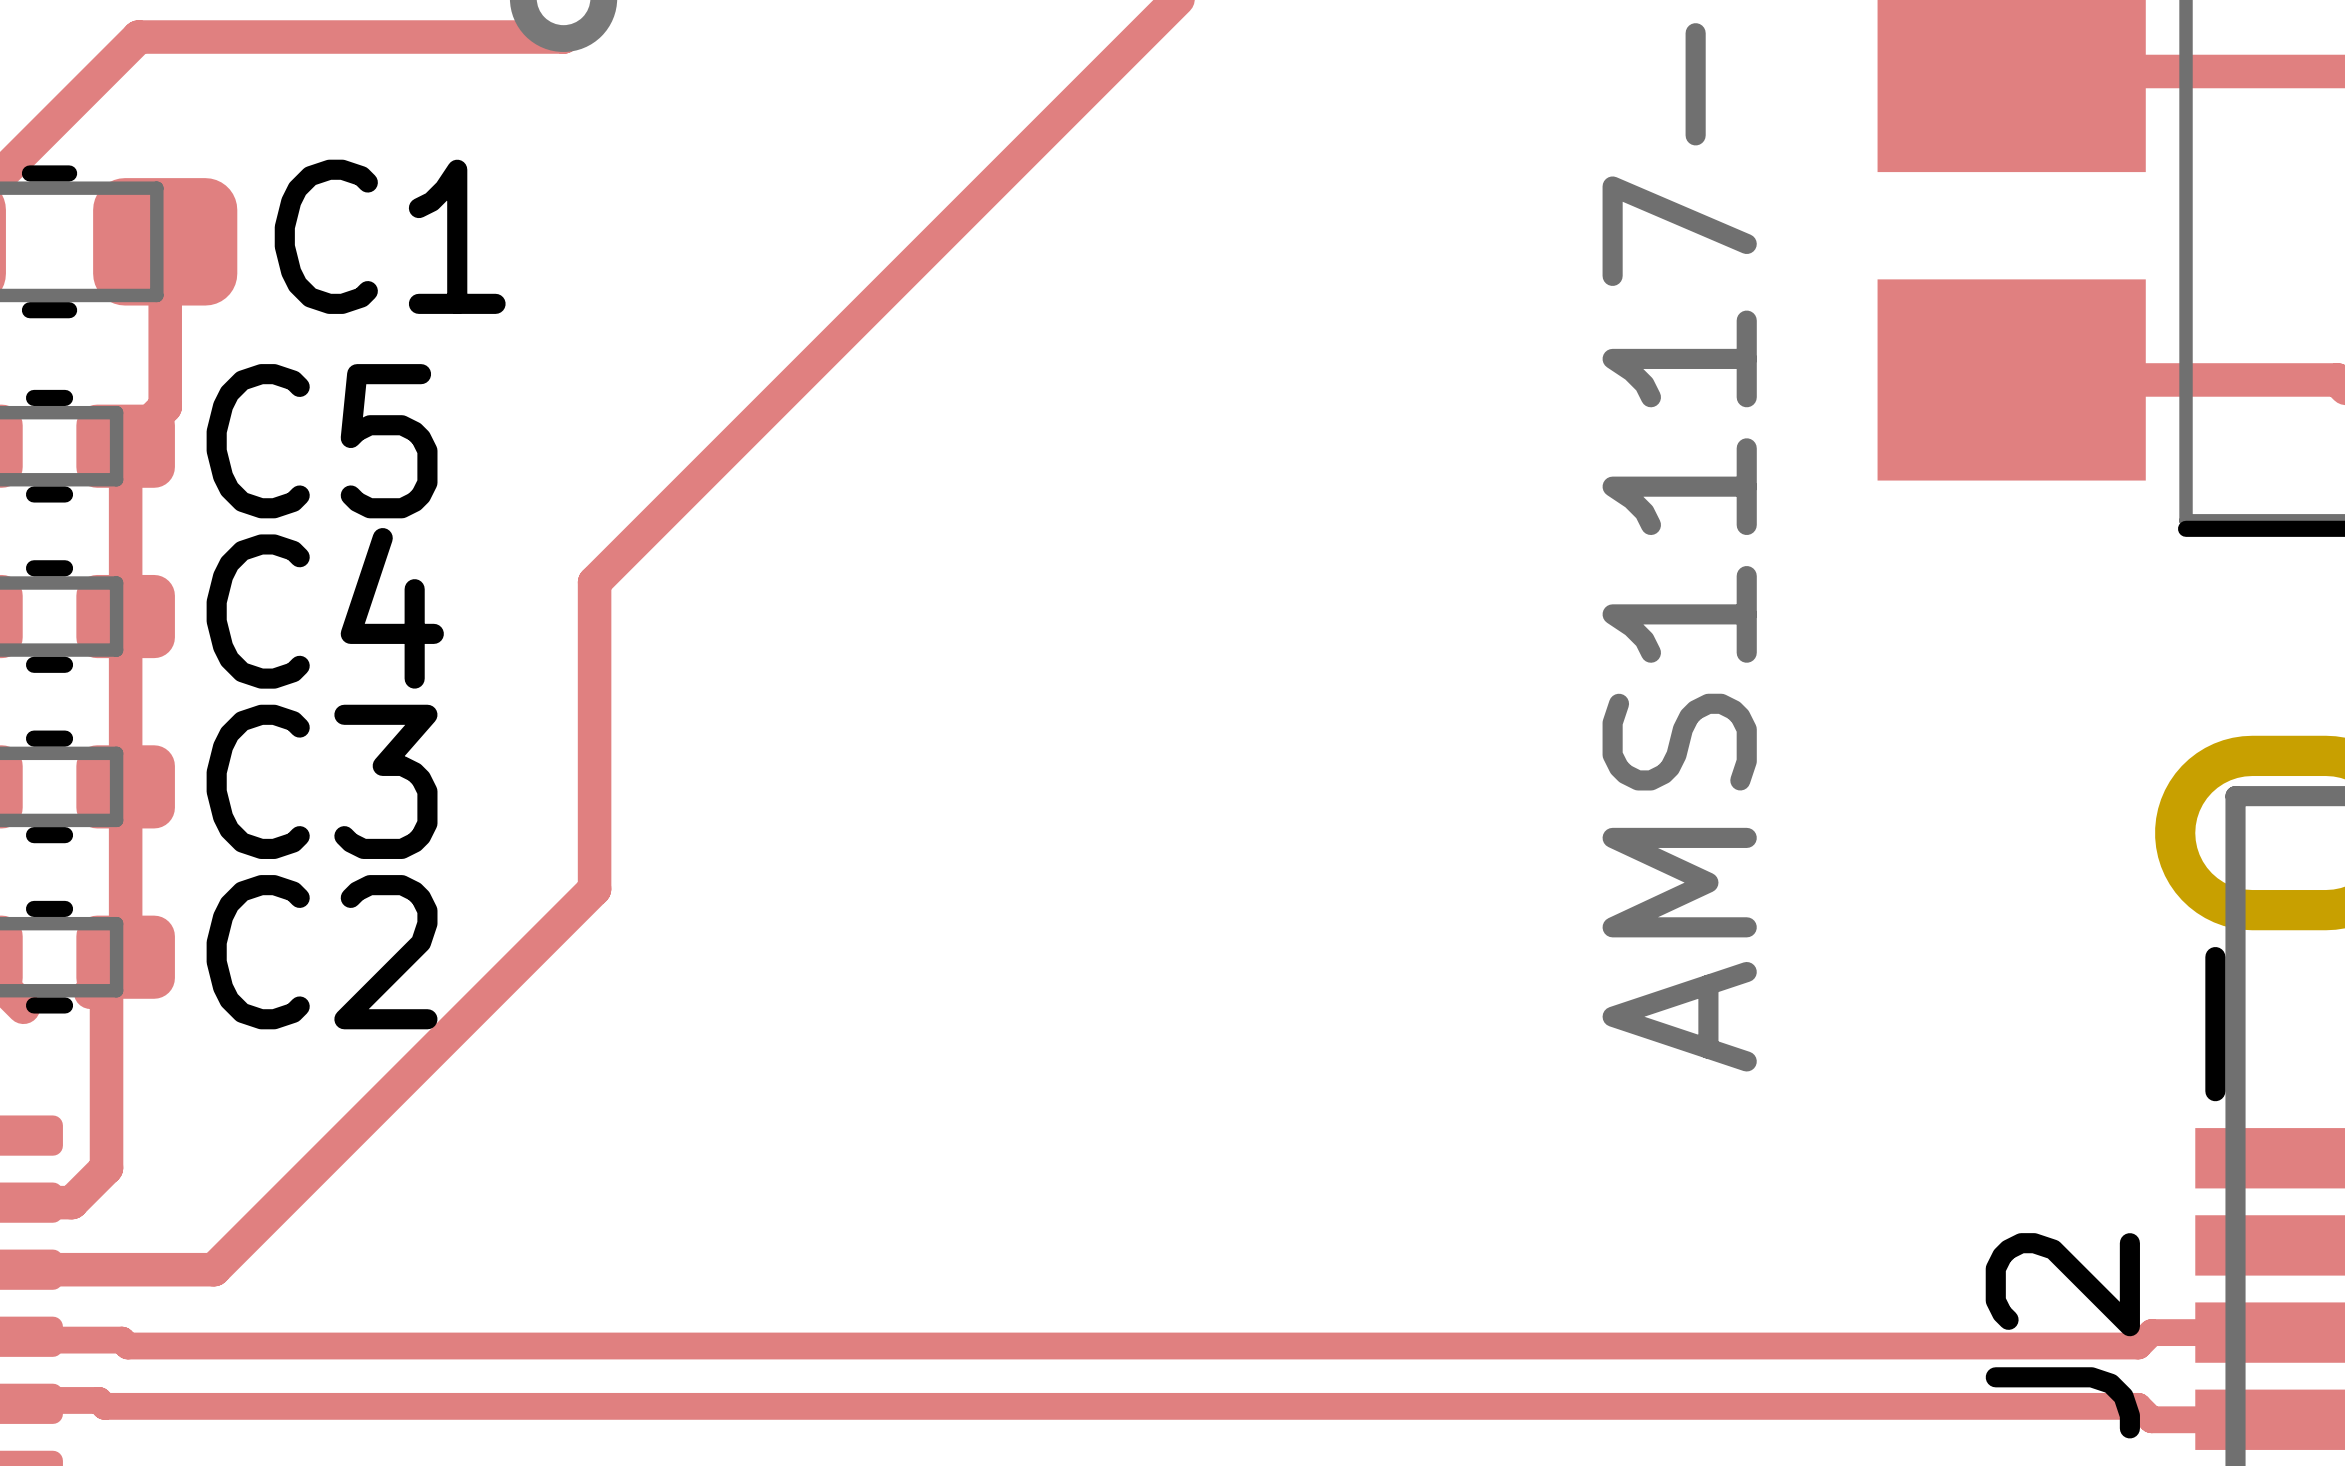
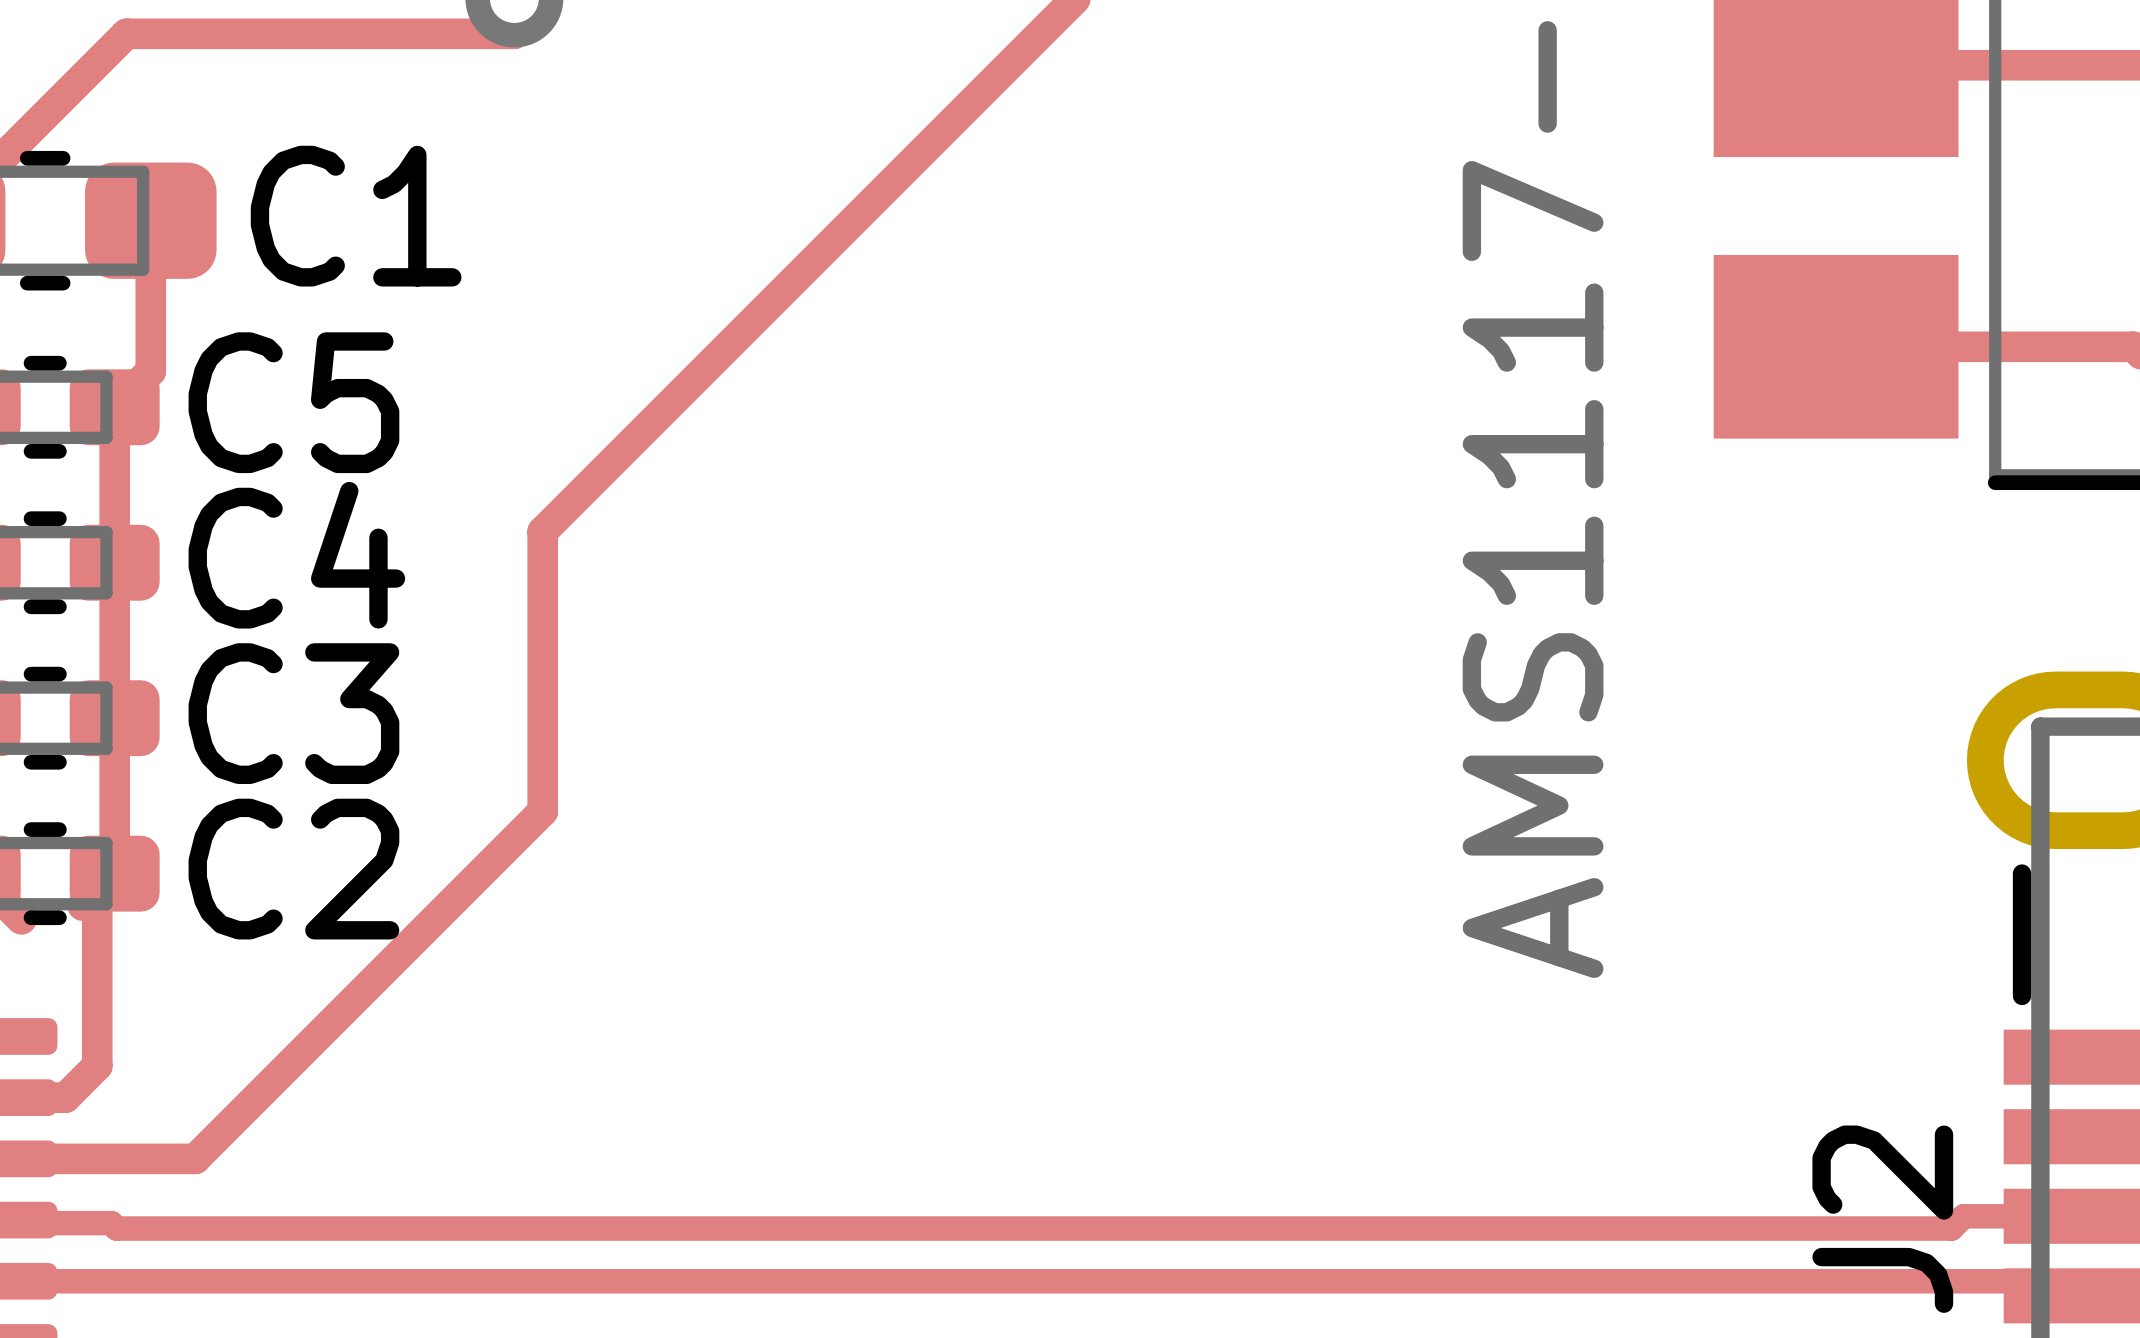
track: (42, 1403) (46, 1400) (98, 1400) (104, 1406) (2138, 1406) (2151, 1419) (2282, 1419) -> (39, 1281) (2068, 1281)

